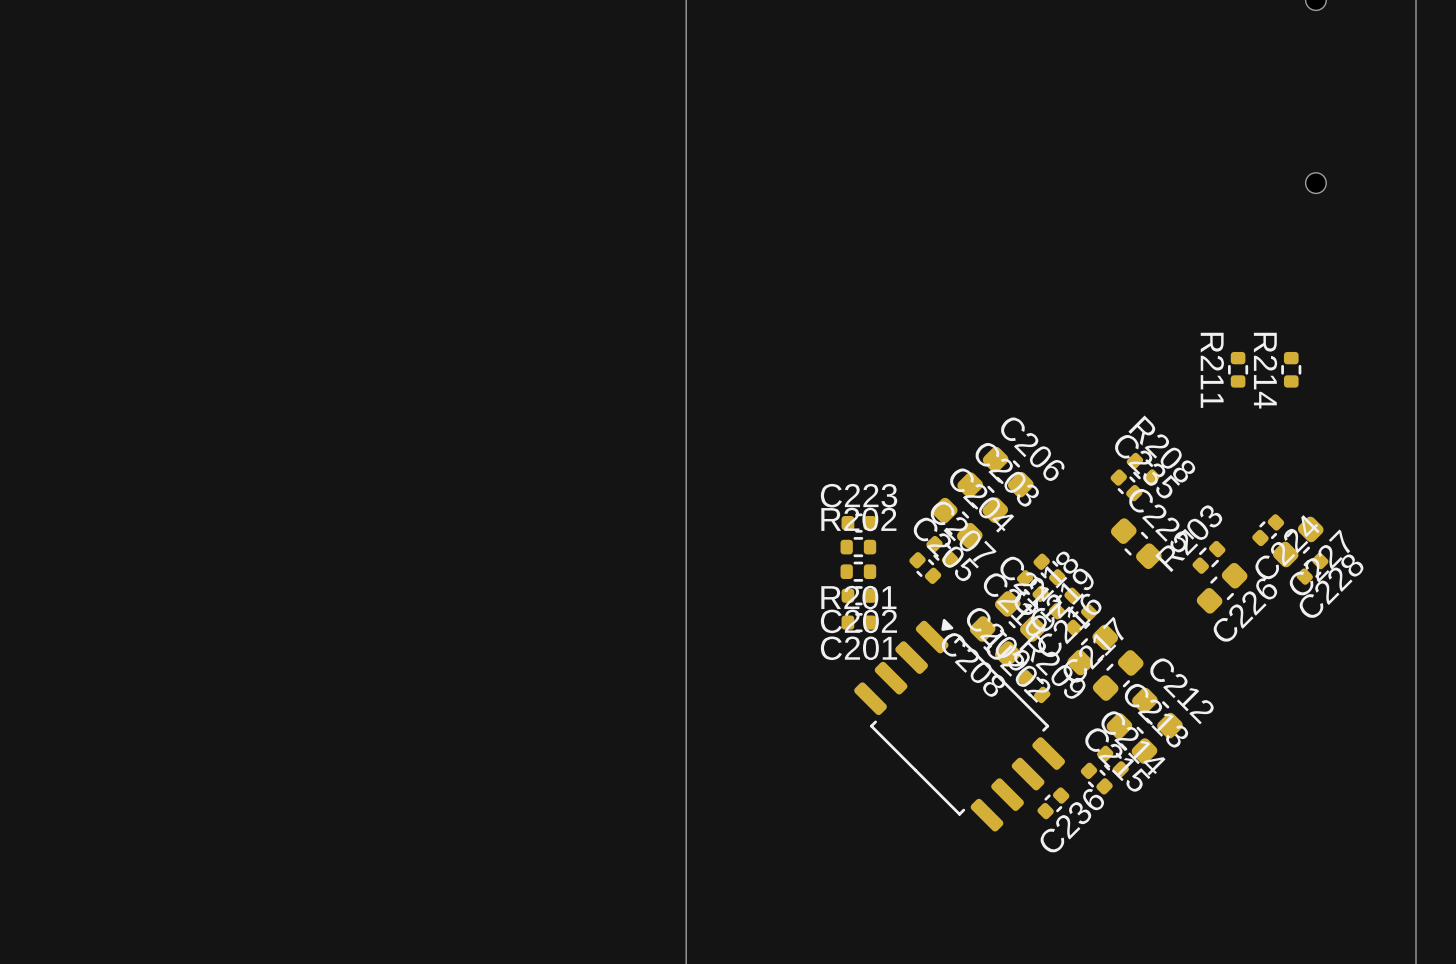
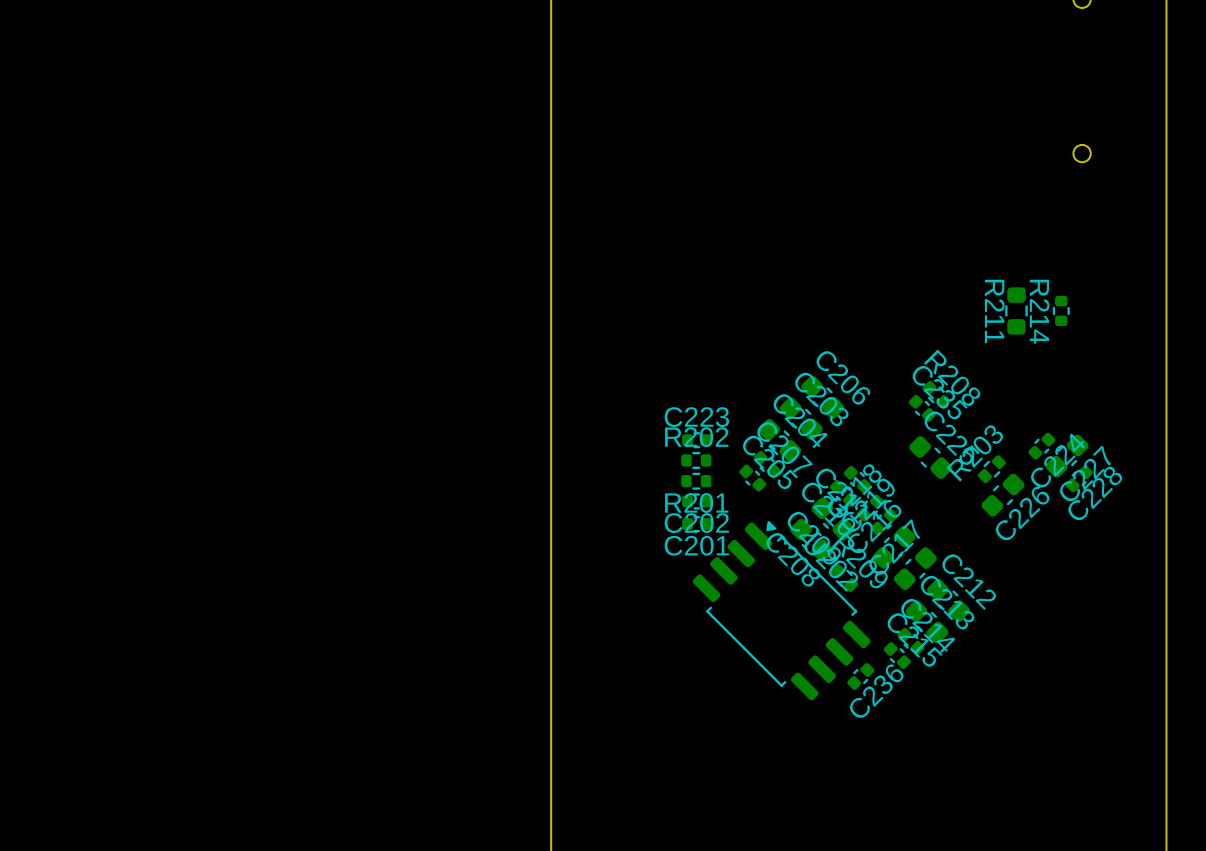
R211 footprint: [1228, 351, 1249, 388] -> [1005, 287, 1028, 335]

